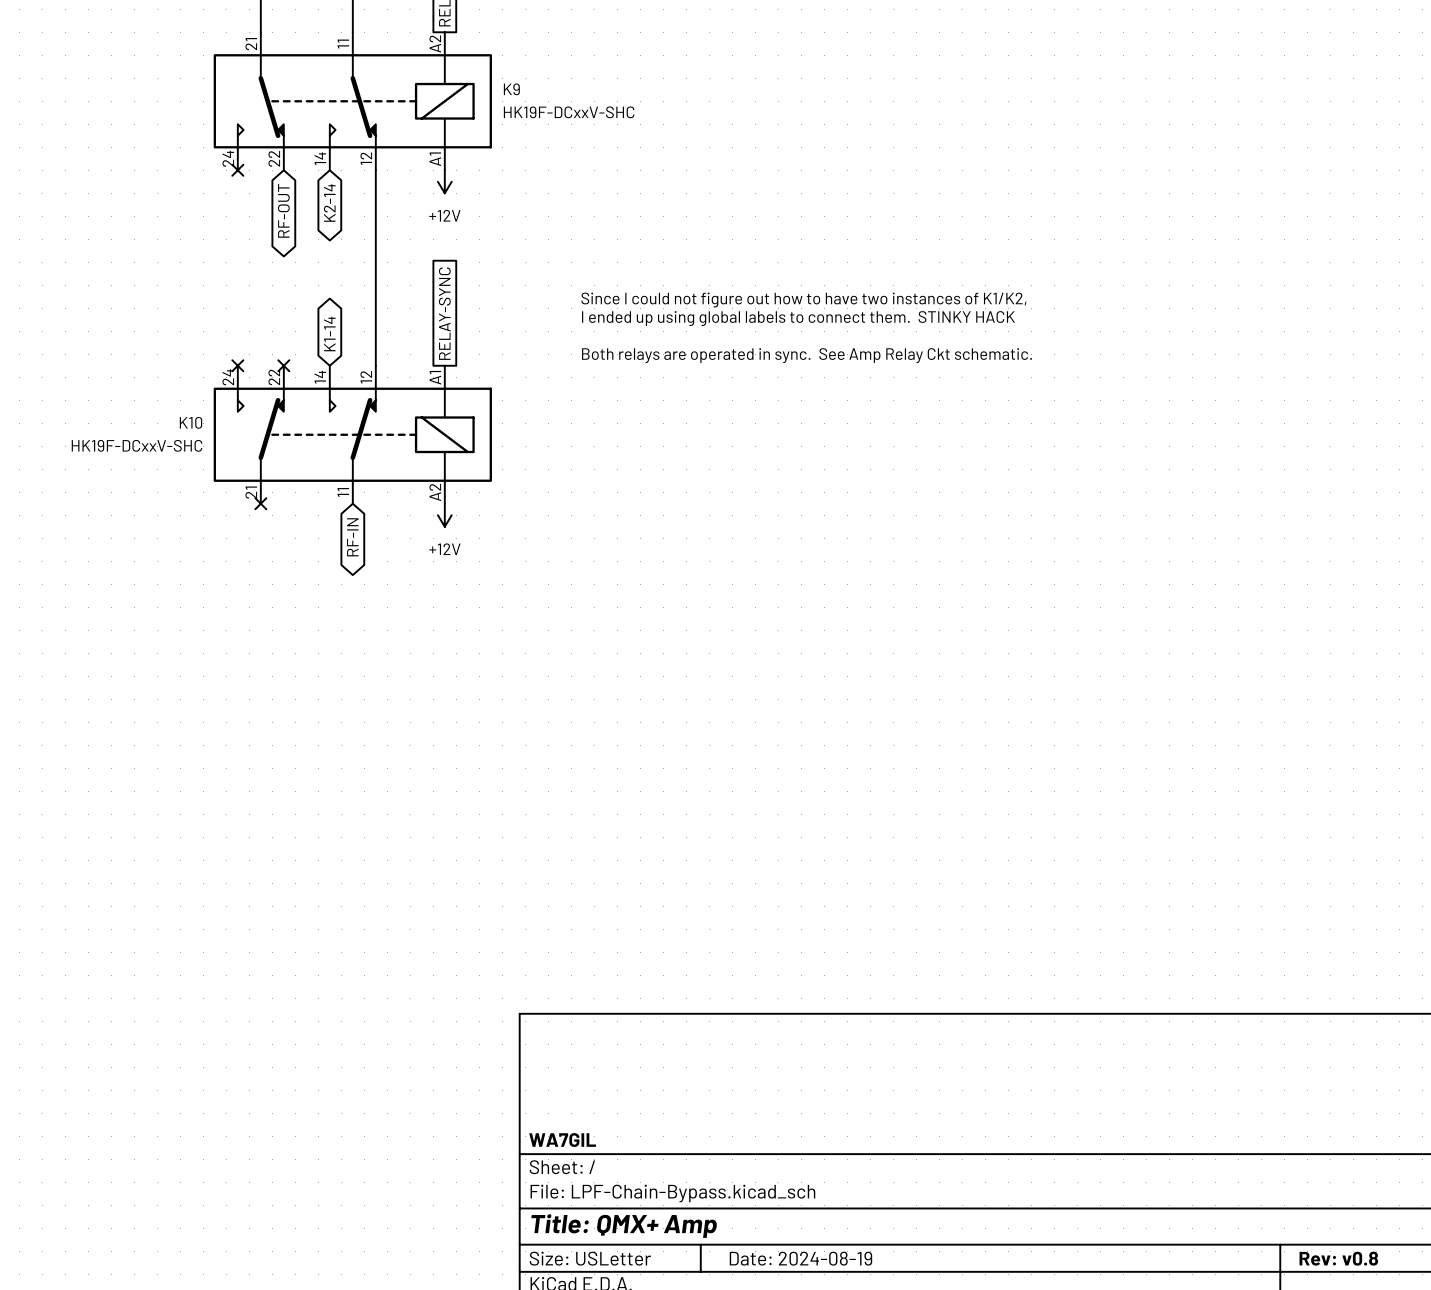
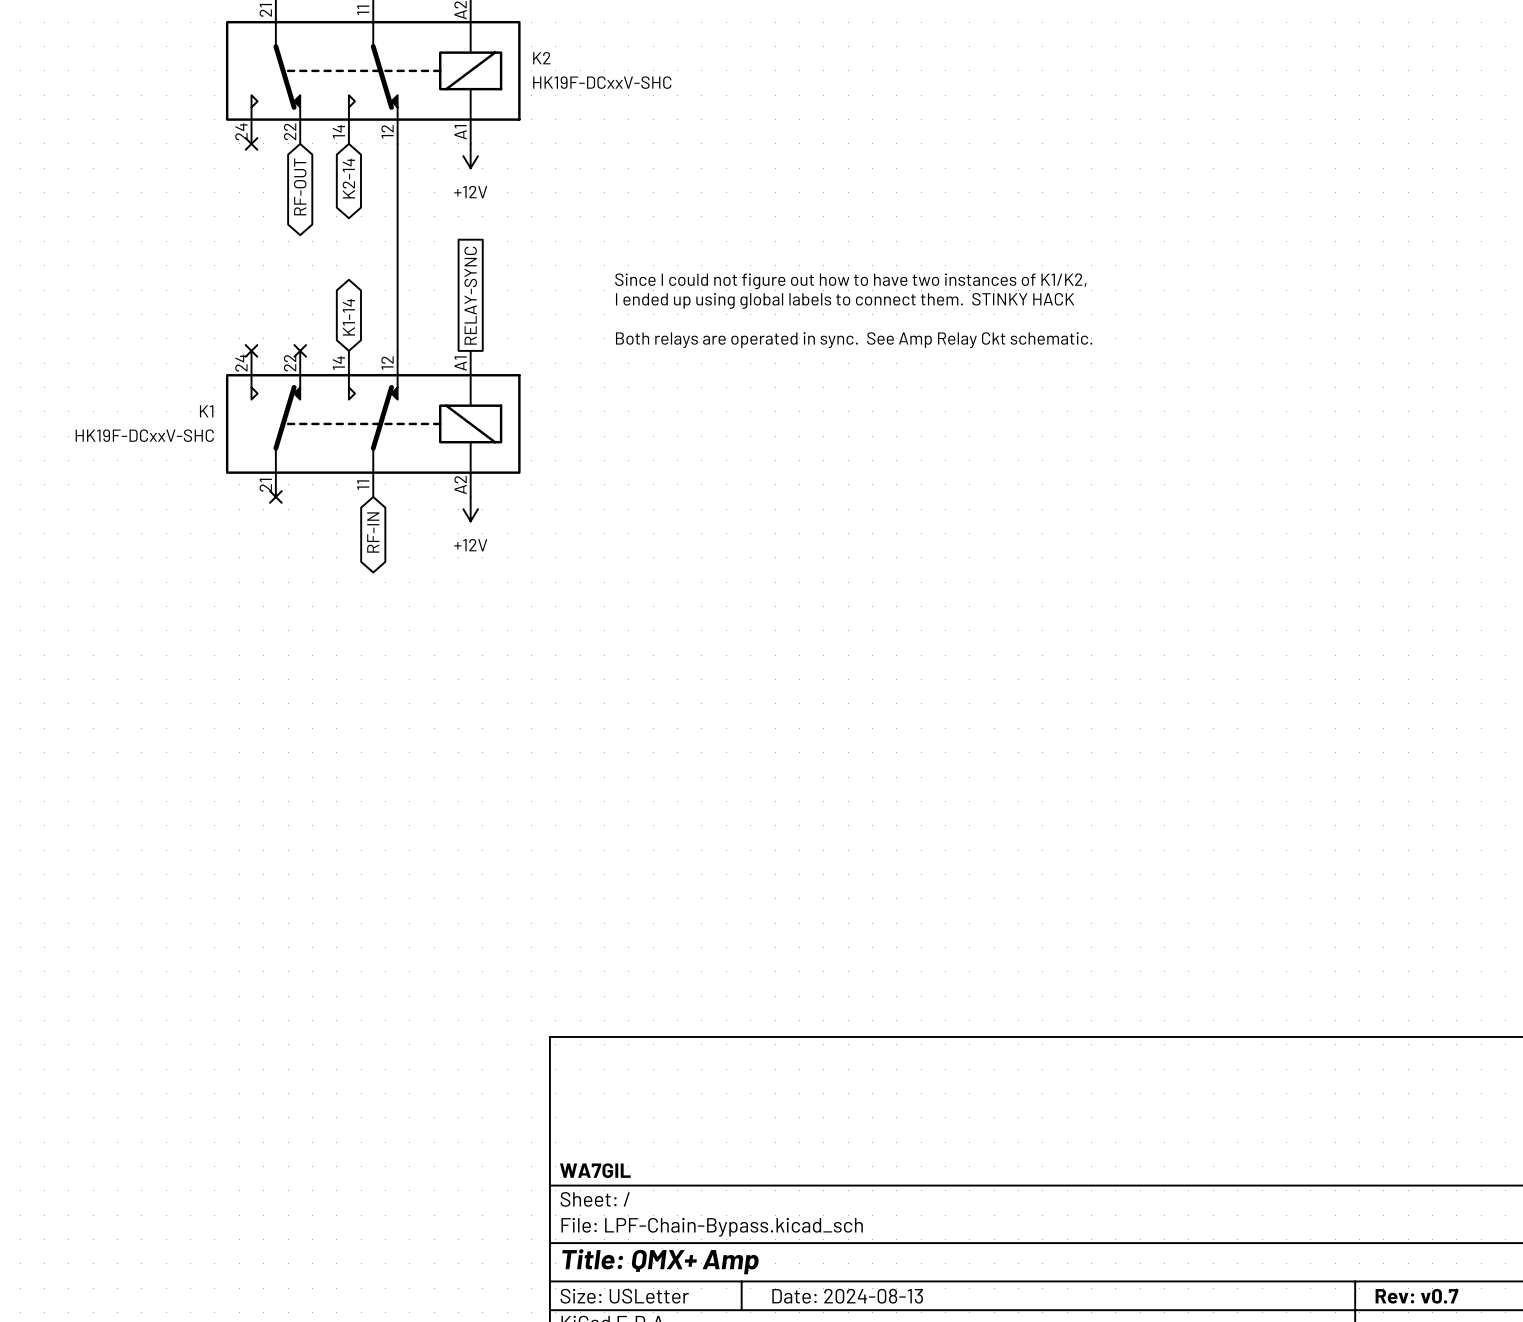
K9 name: K9 (511, 89) -> K2 (541, 58)
K10 name: K10 (190, 422) -> K1 (206, 411)
title block: Date: 2024-08-19 (800, 1258) -> Date: 2024-08-13 (847, 1296)
title block: Rev: v0.8 (1338, 1258) -> Rev: v0.7 (1416, 1296)

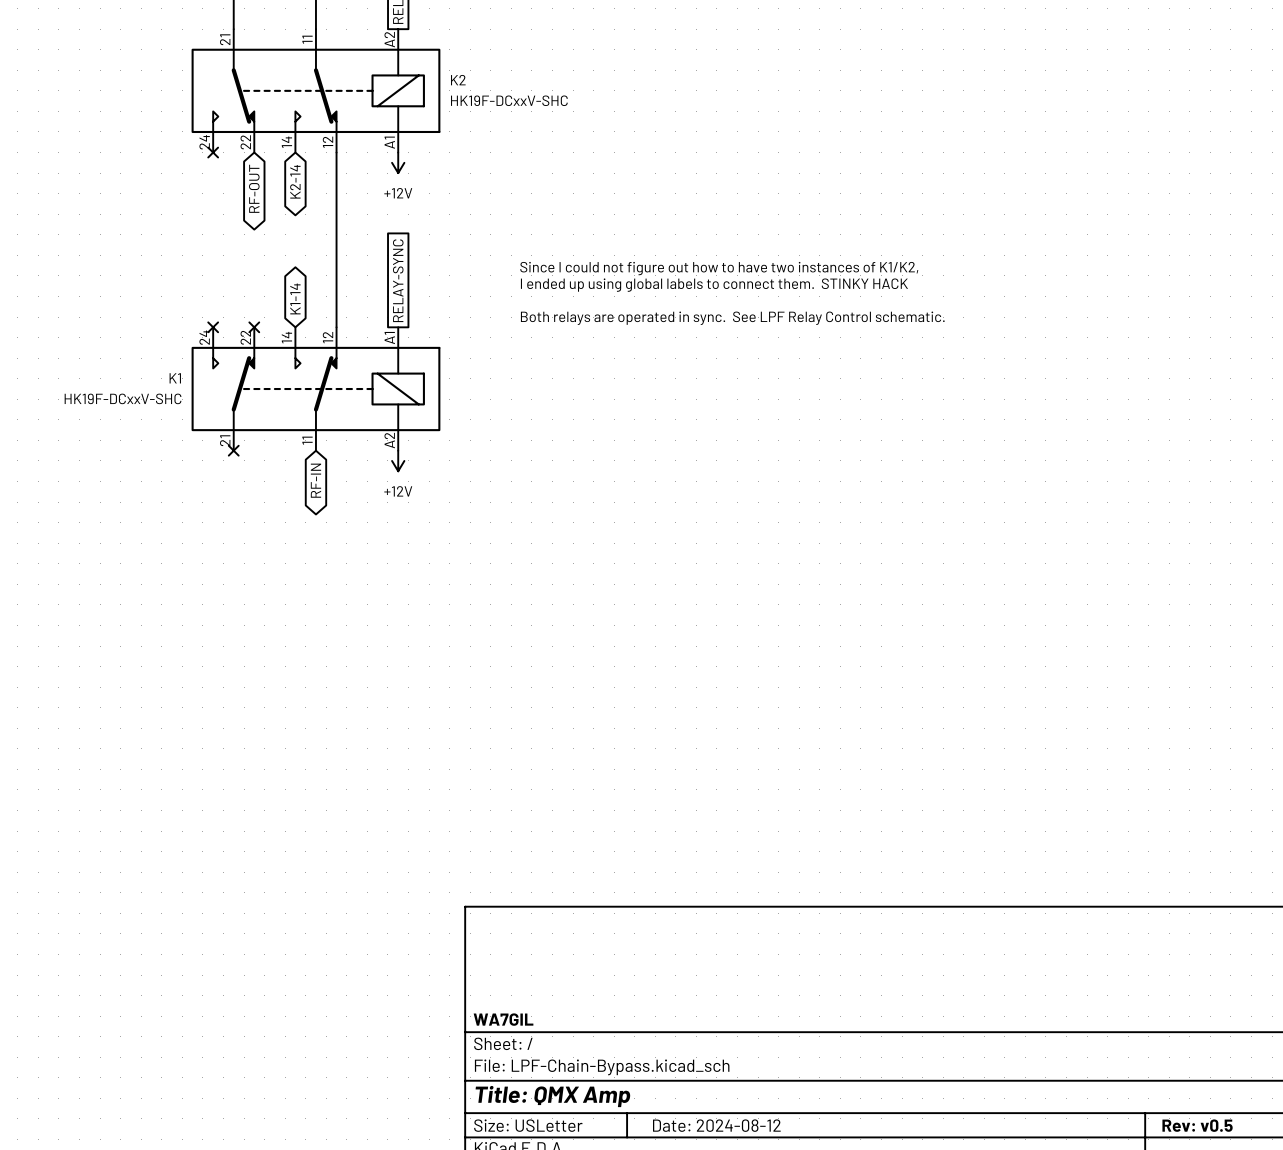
text: Both relays are operated in sync. See Amp Relay Ckt schematic. (854, 340) -> Both relays are operated in sync. See LPF Relay Control schematic. (732, 318)
title block: Title: QMX+ Amp (660, 1261) -> Title: QMX Amp (552, 1096)
title block: Date: 2024-08-13 (847, 1296) -> Date: 2024-08-12 (716, 1125)
title block: Rev: v0.7 (1416, 1296) -> Rev: v0.5 (1197, 1125)

